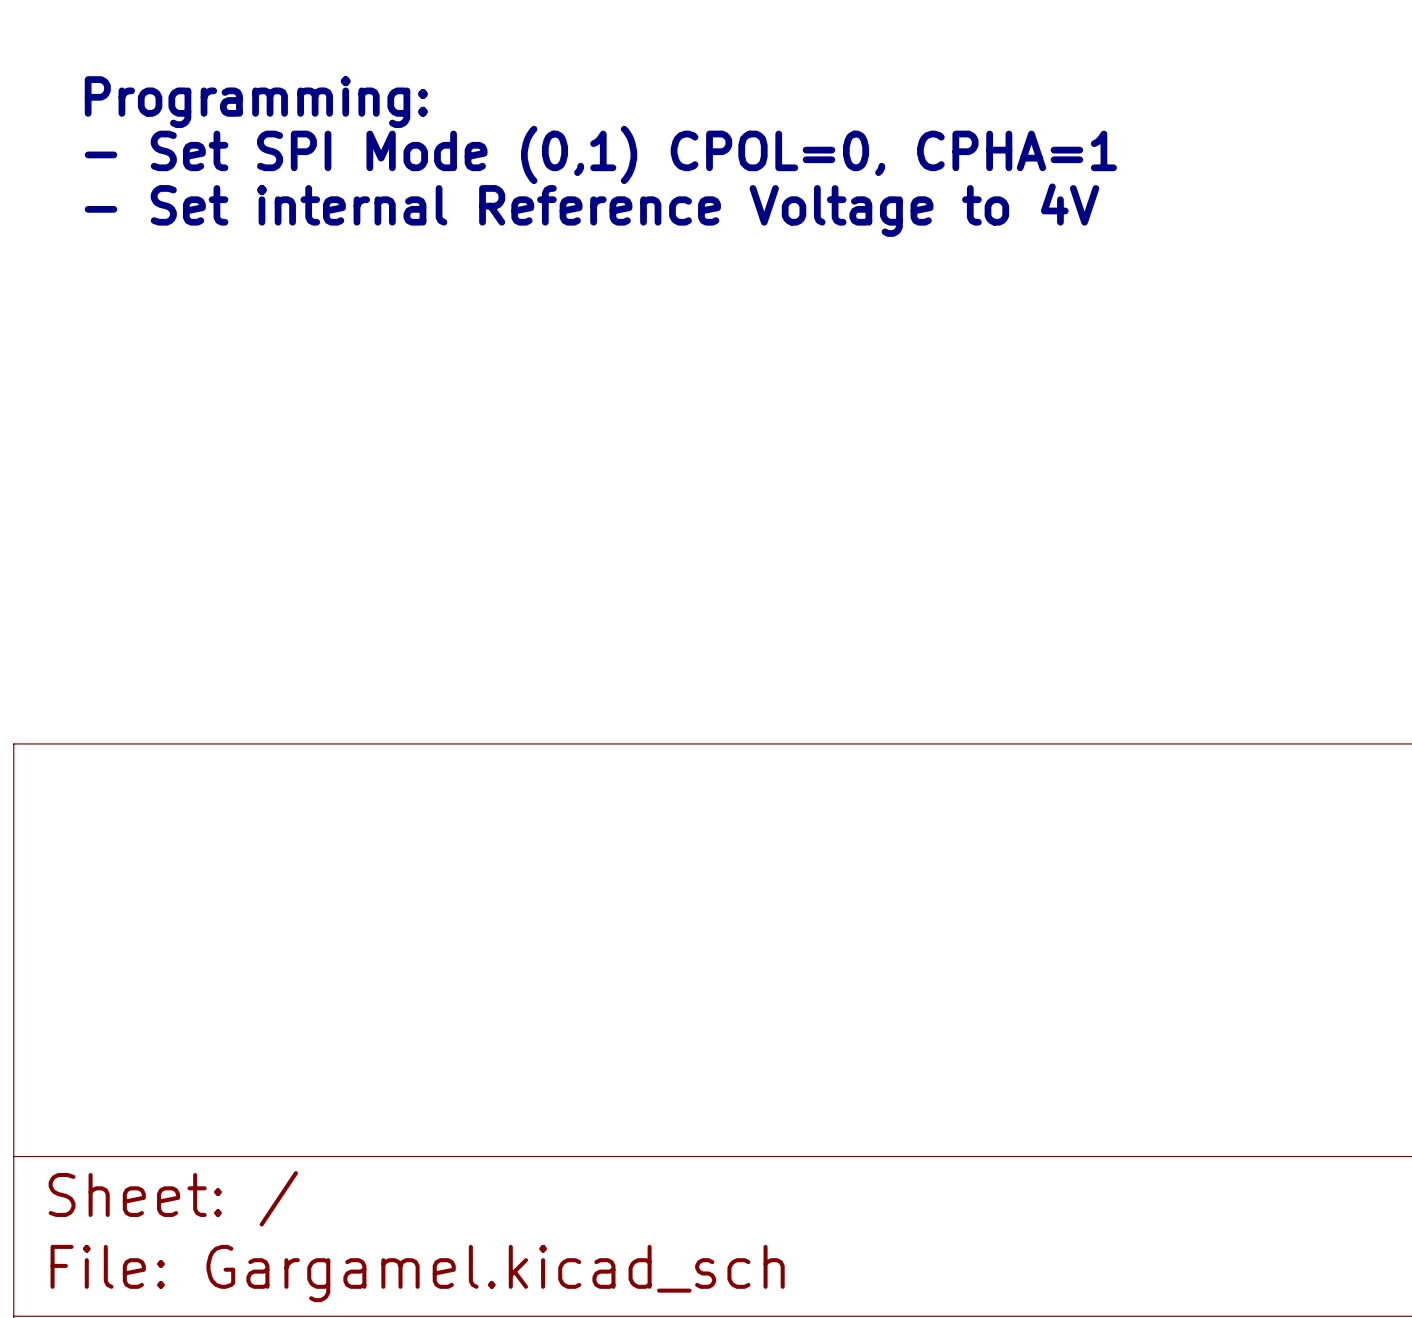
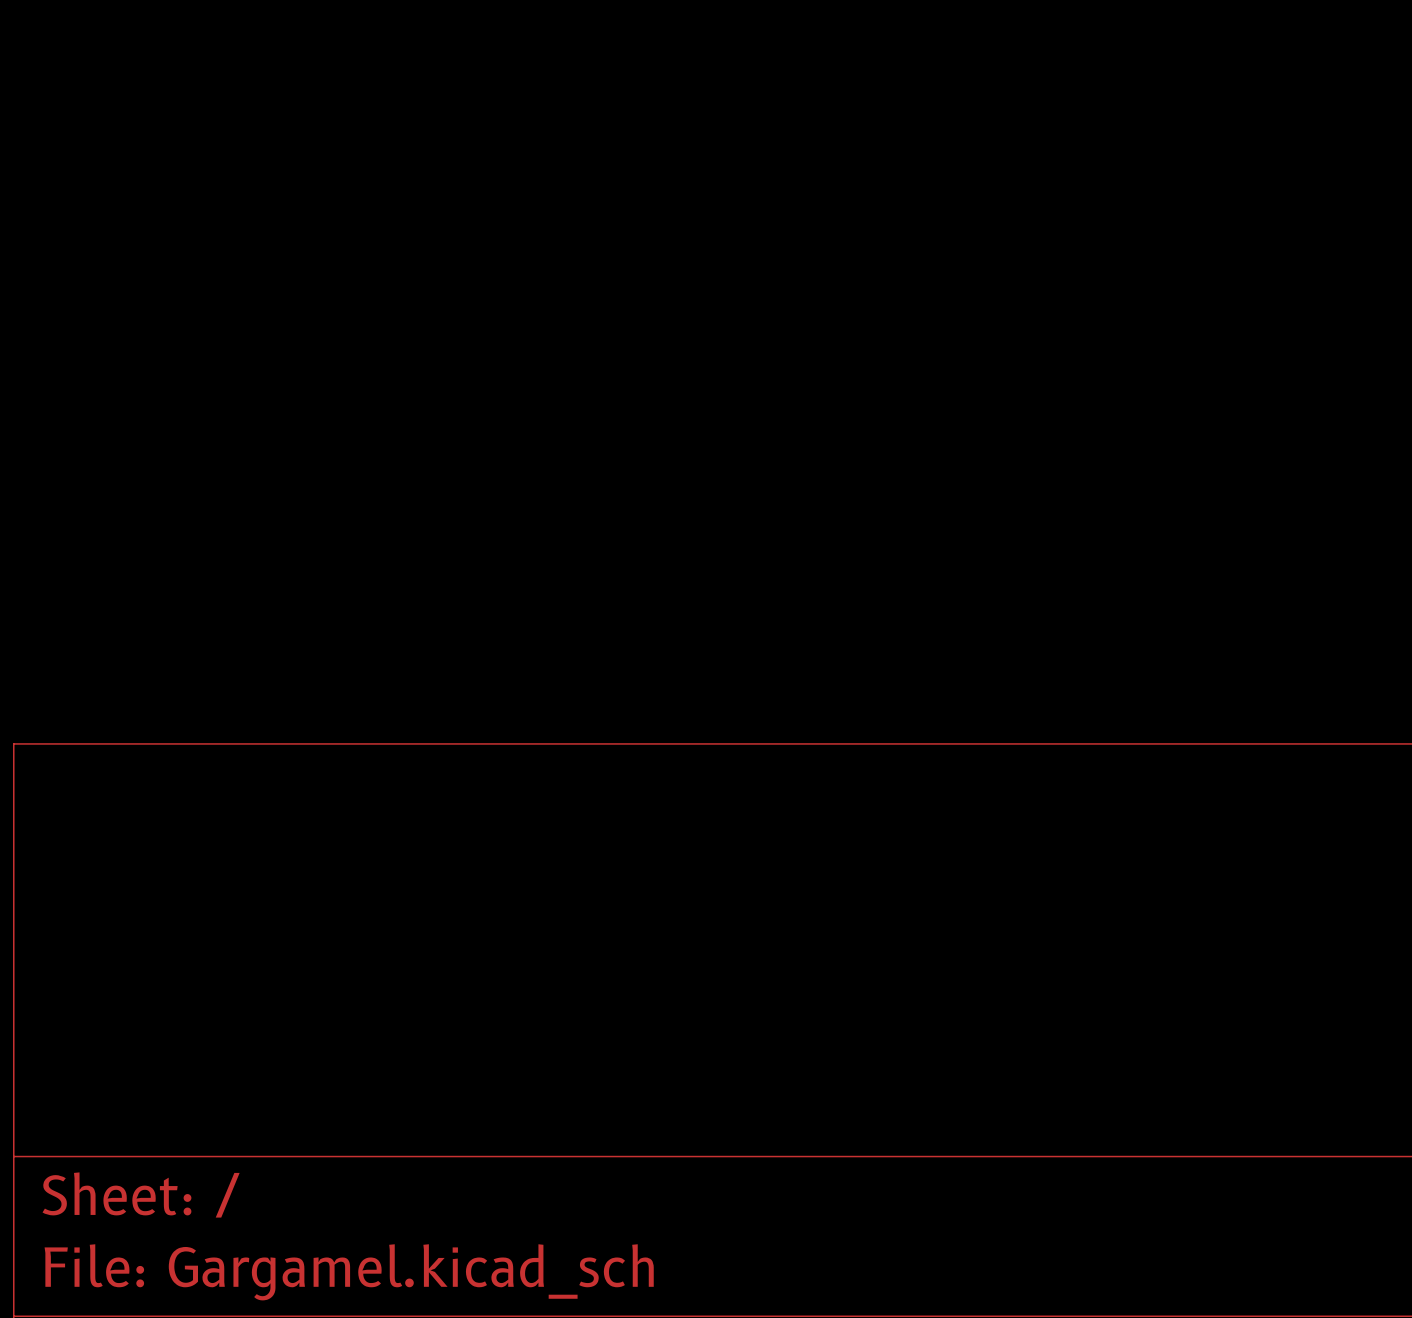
text: Programming: (256, 102) -> none
text: - Set SPI Mode (0,1) CPOL=0, CPHA=1 (600, 154) -> none
text: - Set internal Reference Voltage to 4V (591, 210) -> none

